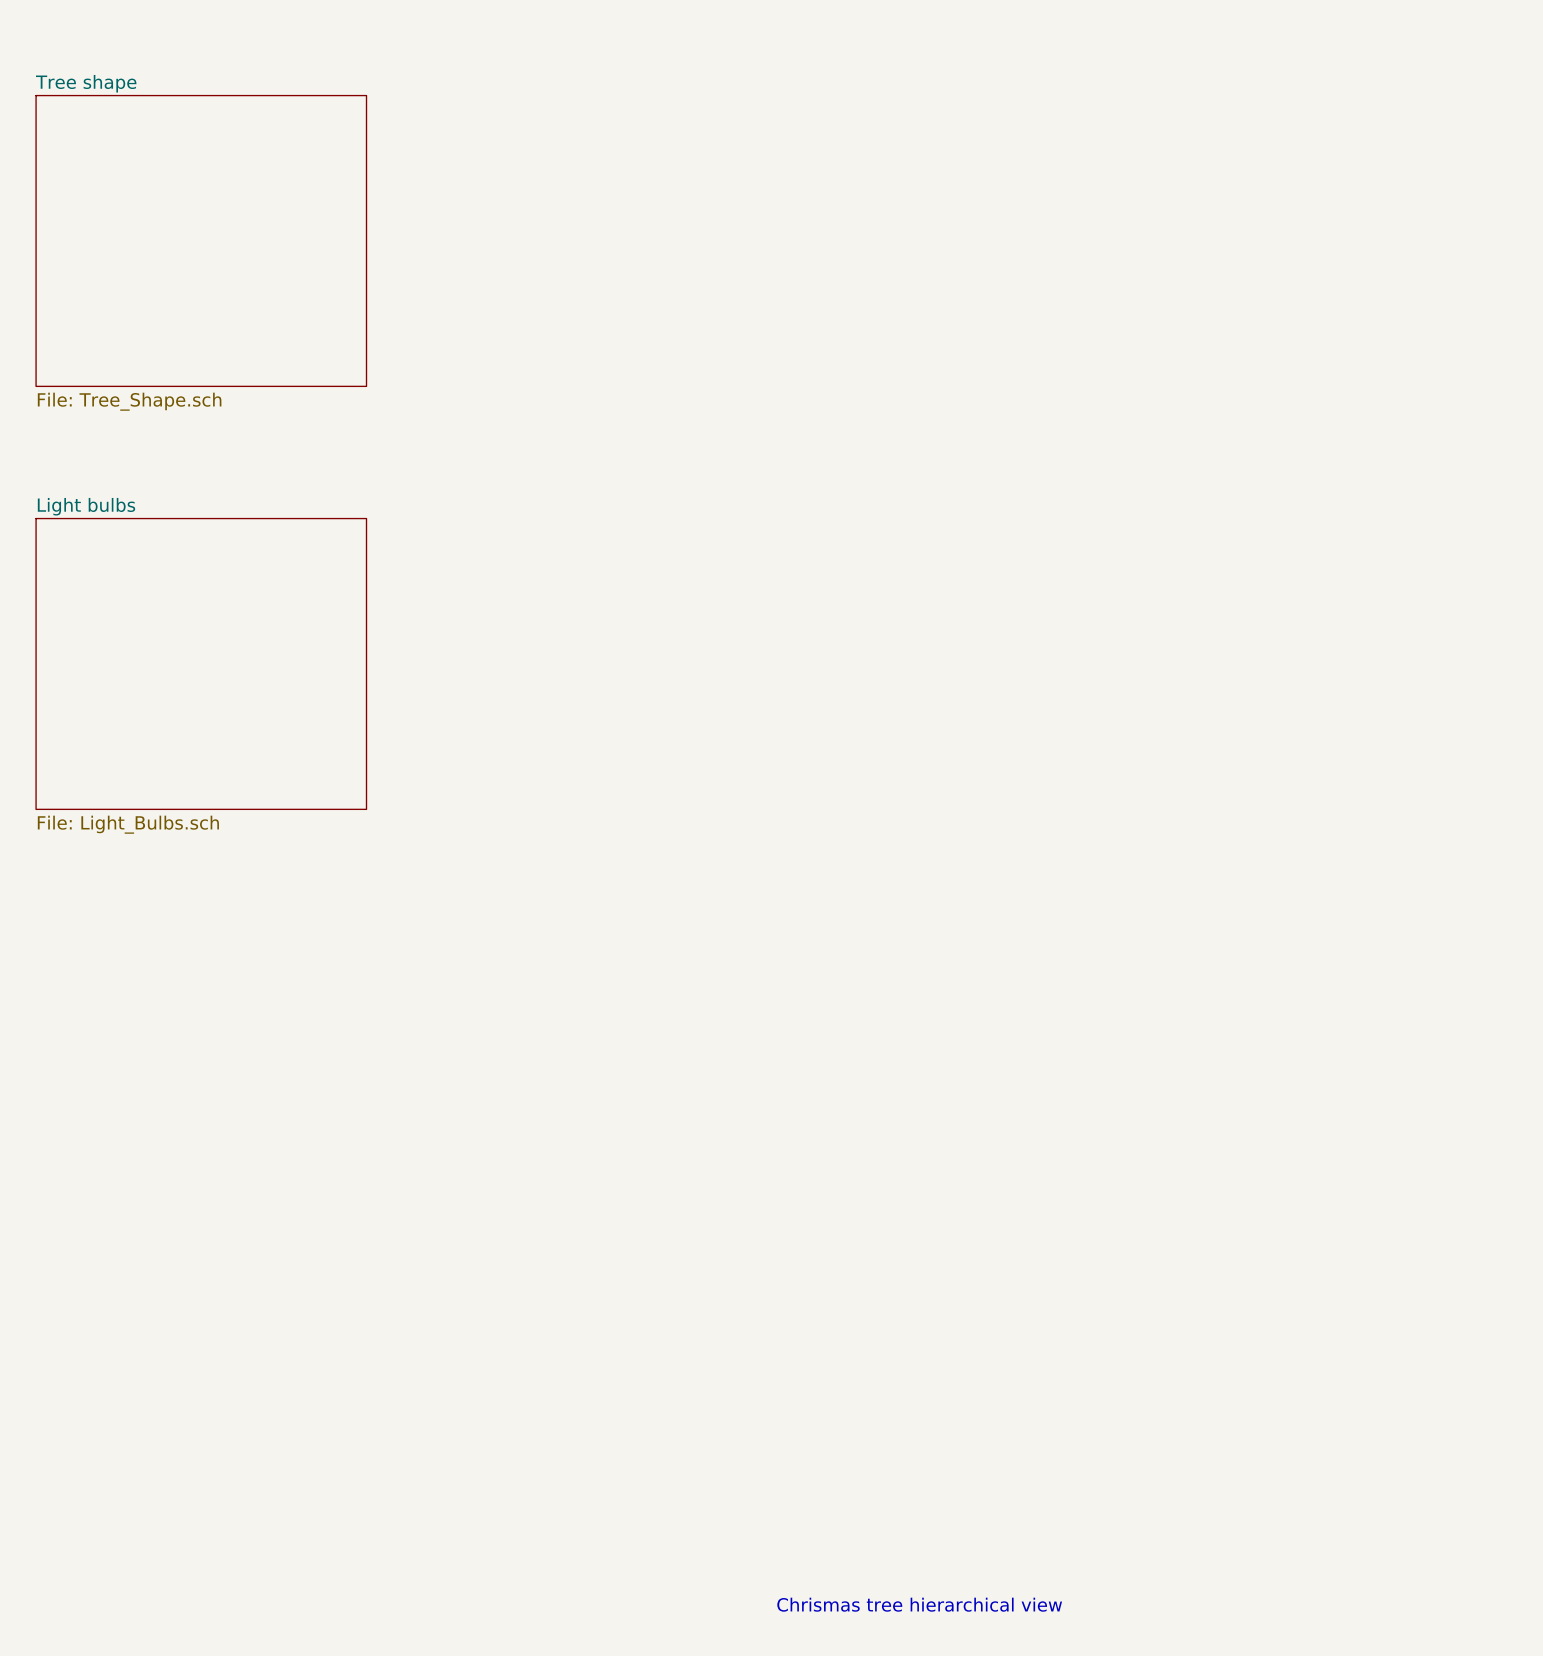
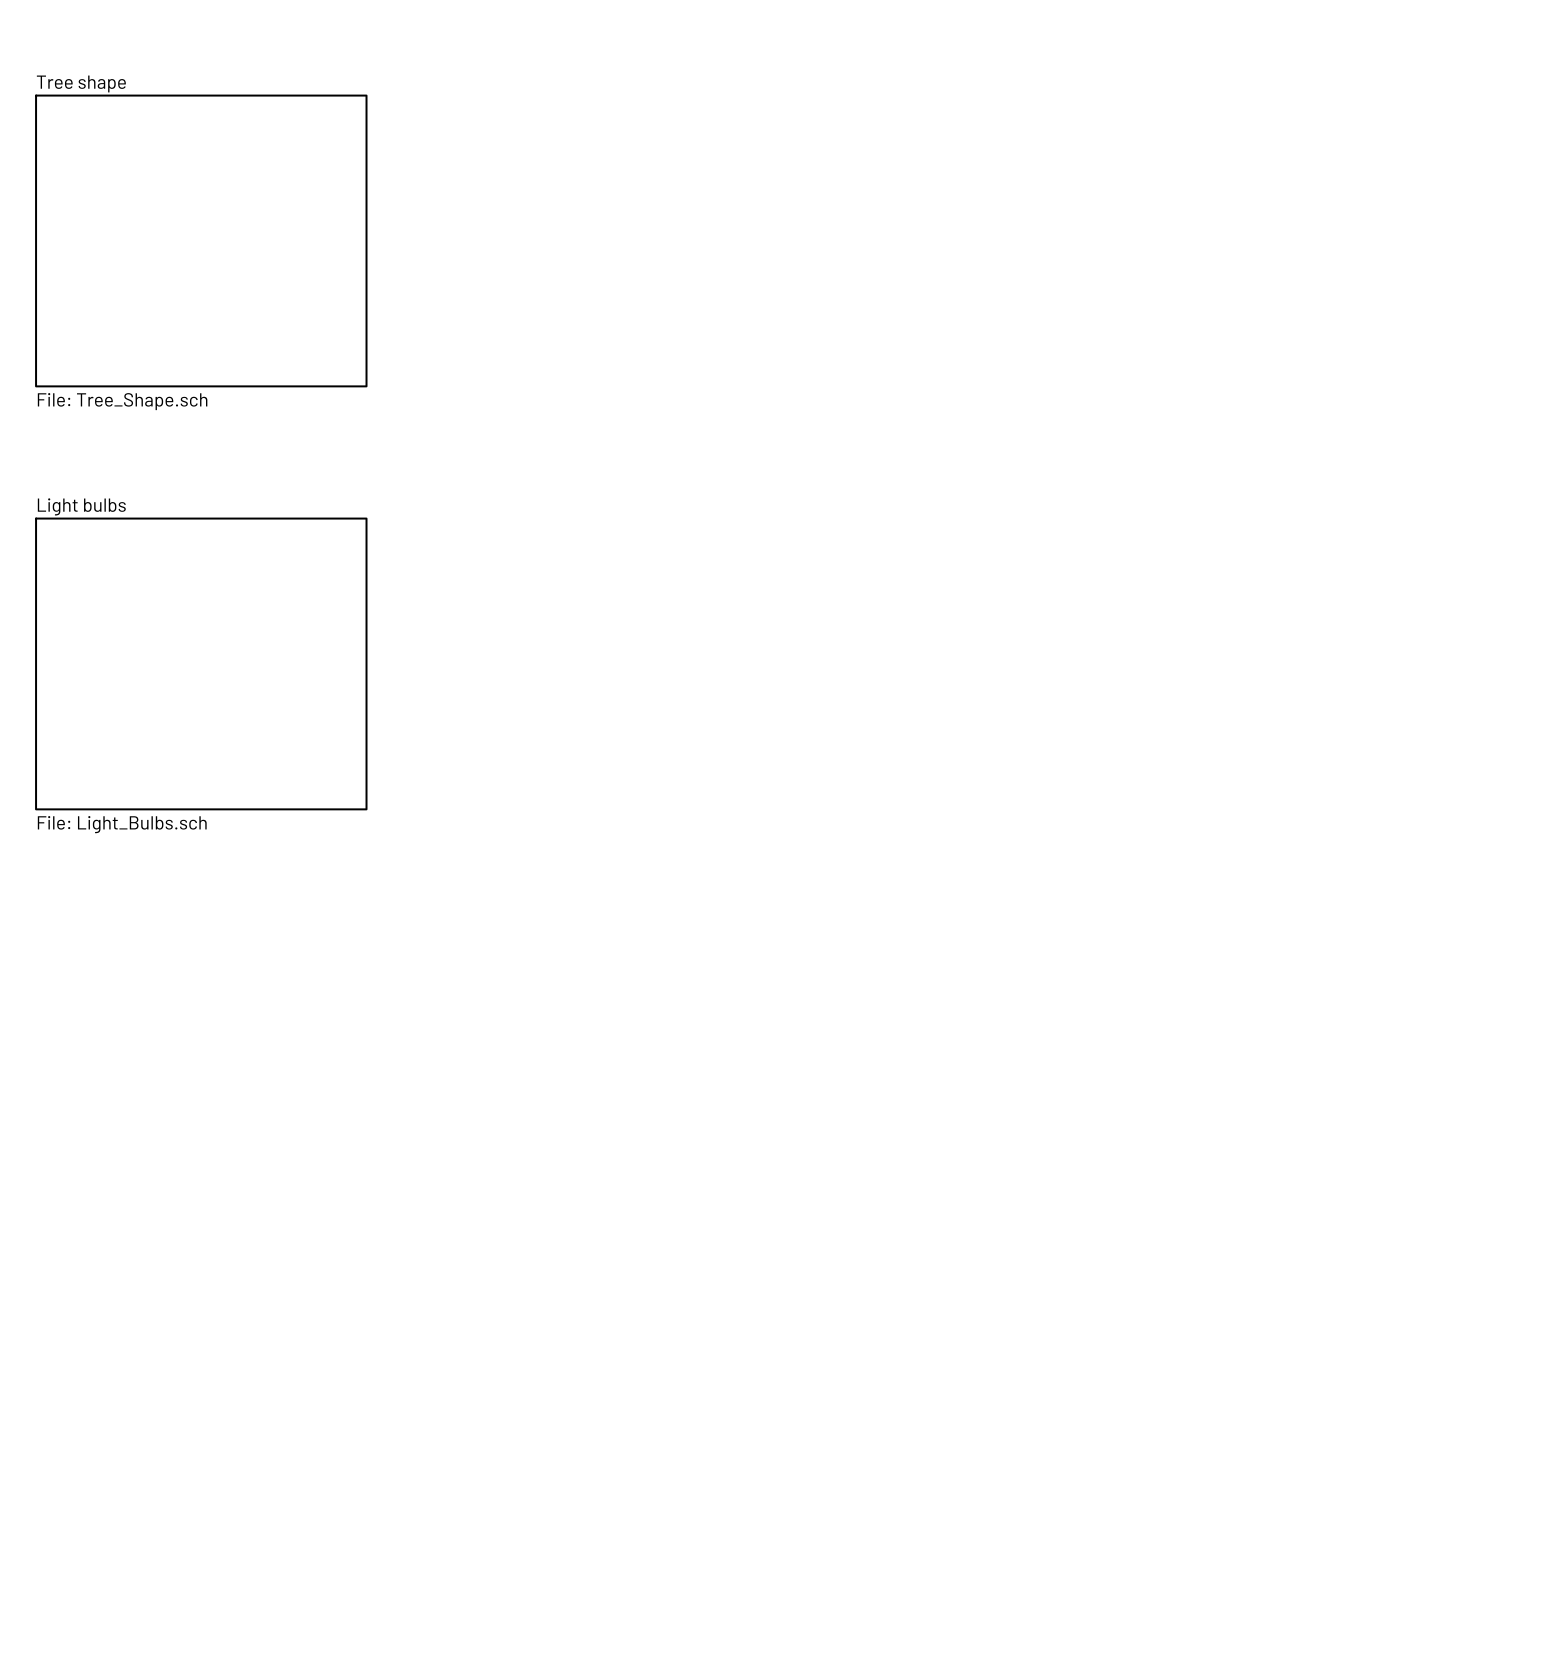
text: Chrismas tree hierarchical view (919, 1604) -> none

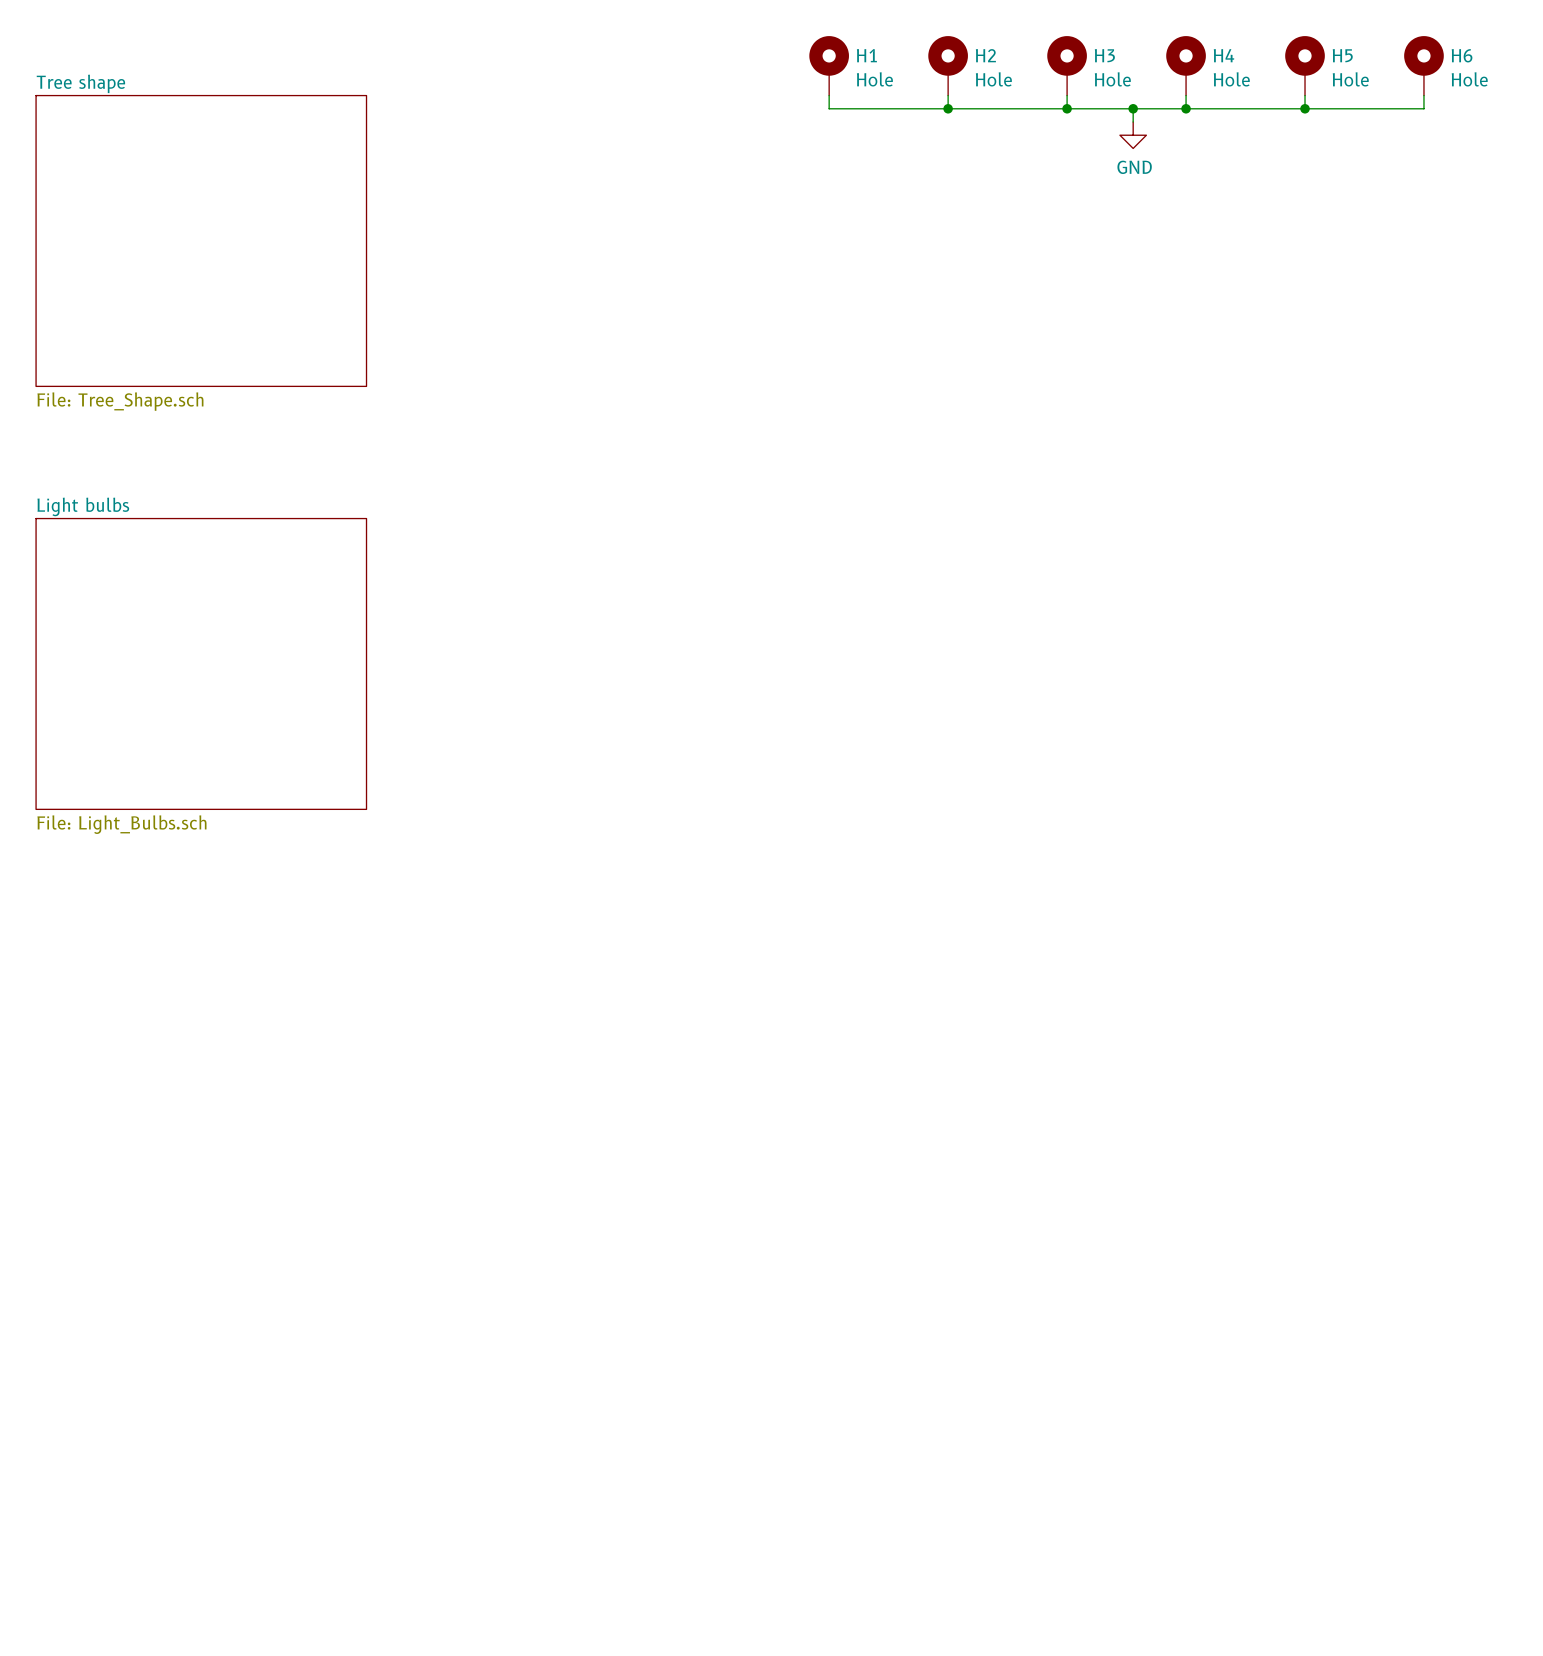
H1: none -> Hole (829, 65)
H2: none -> Hole (948, 65)
H3: none -> Hole (1067, 65)
H4: none -> Hole (1186, 65)
H5: none -> Hole (1305, 65)
H6: none -> Hole (1423, 65)
wire: none -> (829, 95) (829, 108) (1423, 108) (1423, 95)
wire: none -> (948, 95) (948, 108)
wire: none -> (1067, 95) (1067, 108)
wire: none -> (1186, 95) (1186, 108)
wire: none -> (1305, 95) (1305, 108)
junction: none -> (948, 108)
junction: none -> (1067, 108)
wire: none -> (1133, 108) (1133, 122)
junction: none -> (1133, 108)
junction: none -> (1186, 108)
junction: none -> (1305, 108)
power symbol: none -> GND (1133, 135)

